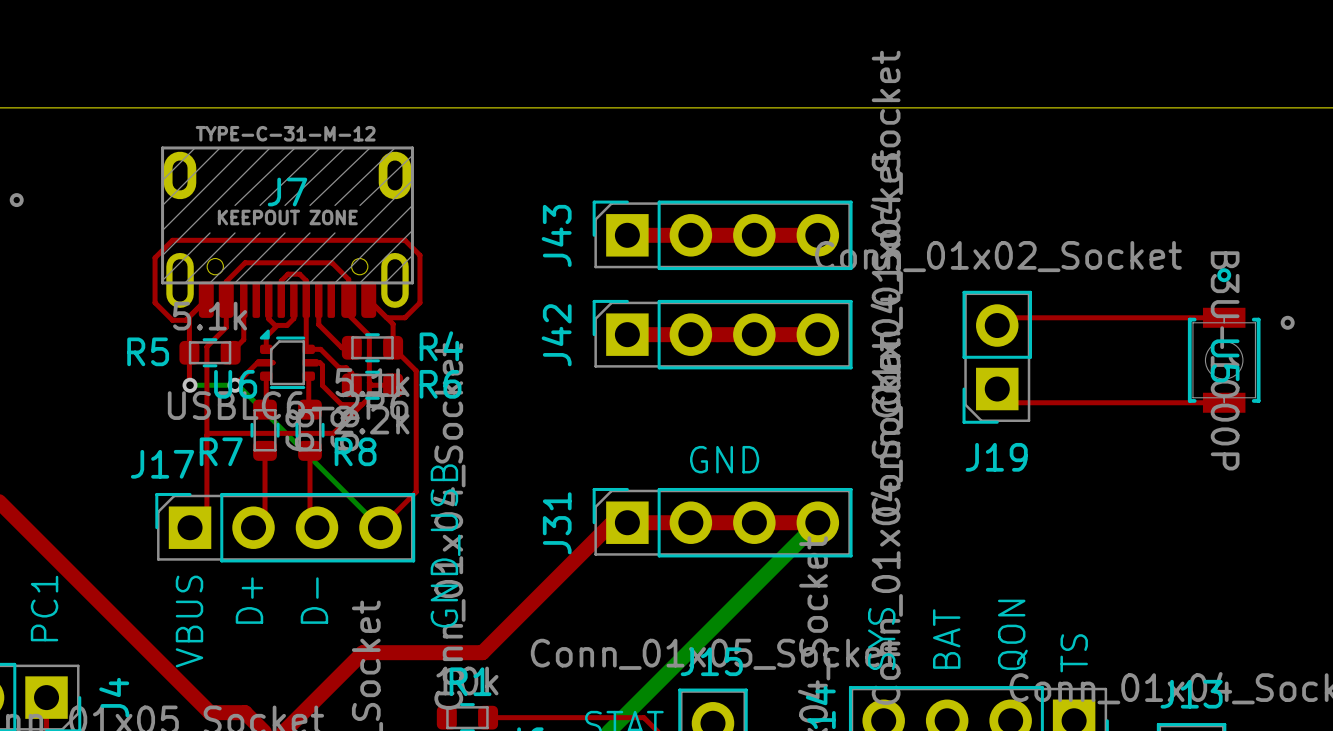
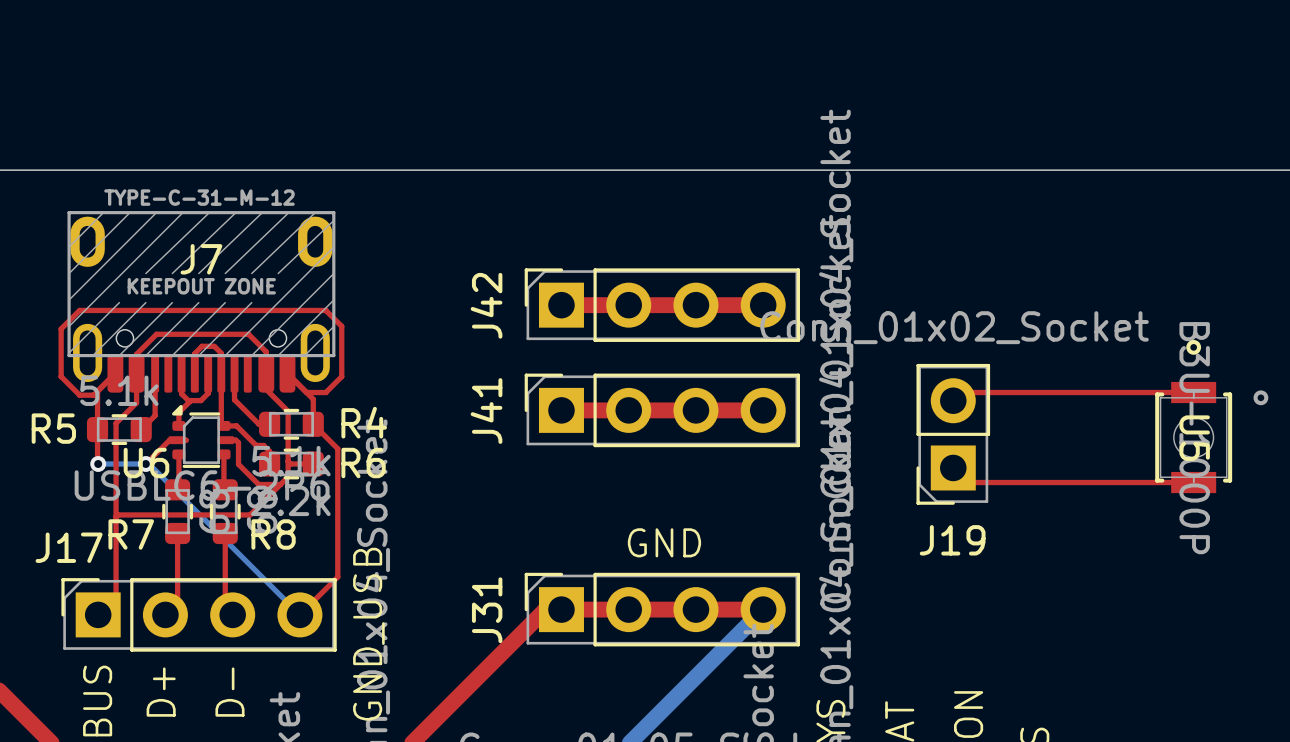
J43 name: J43 (556, 235) -> J42 (486, 305)
J42 name: J42 (556, 335) -> J41 (486, 411)

